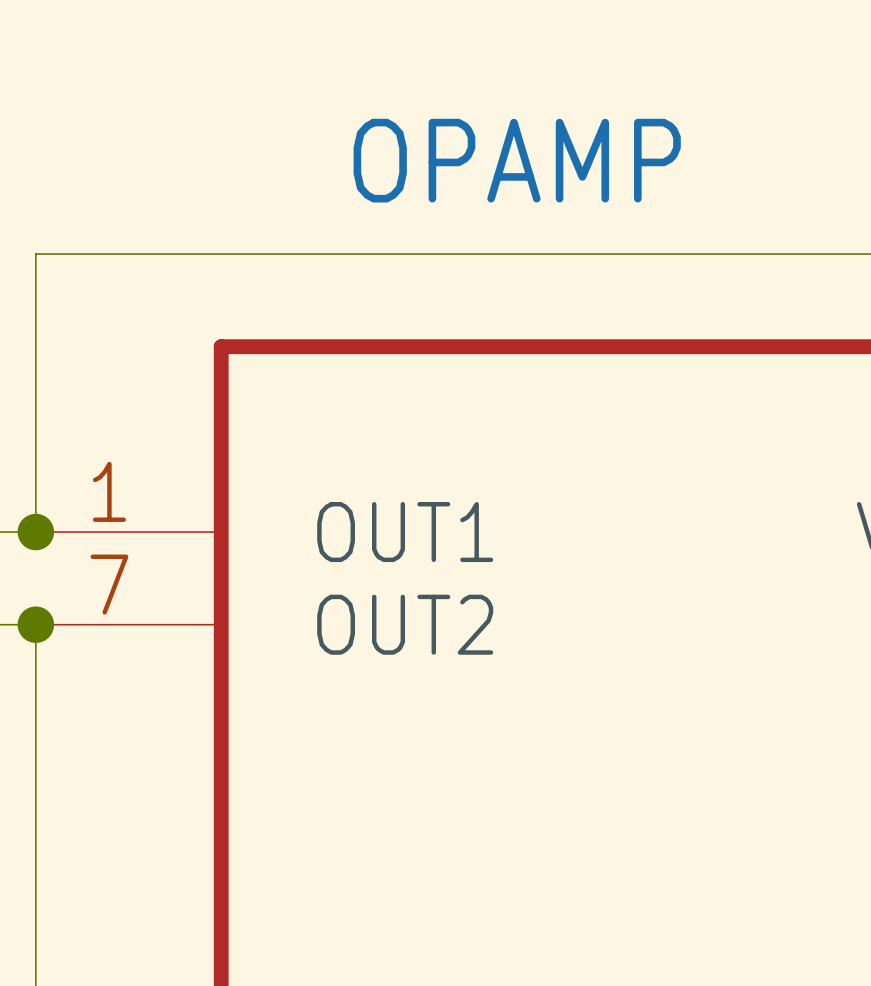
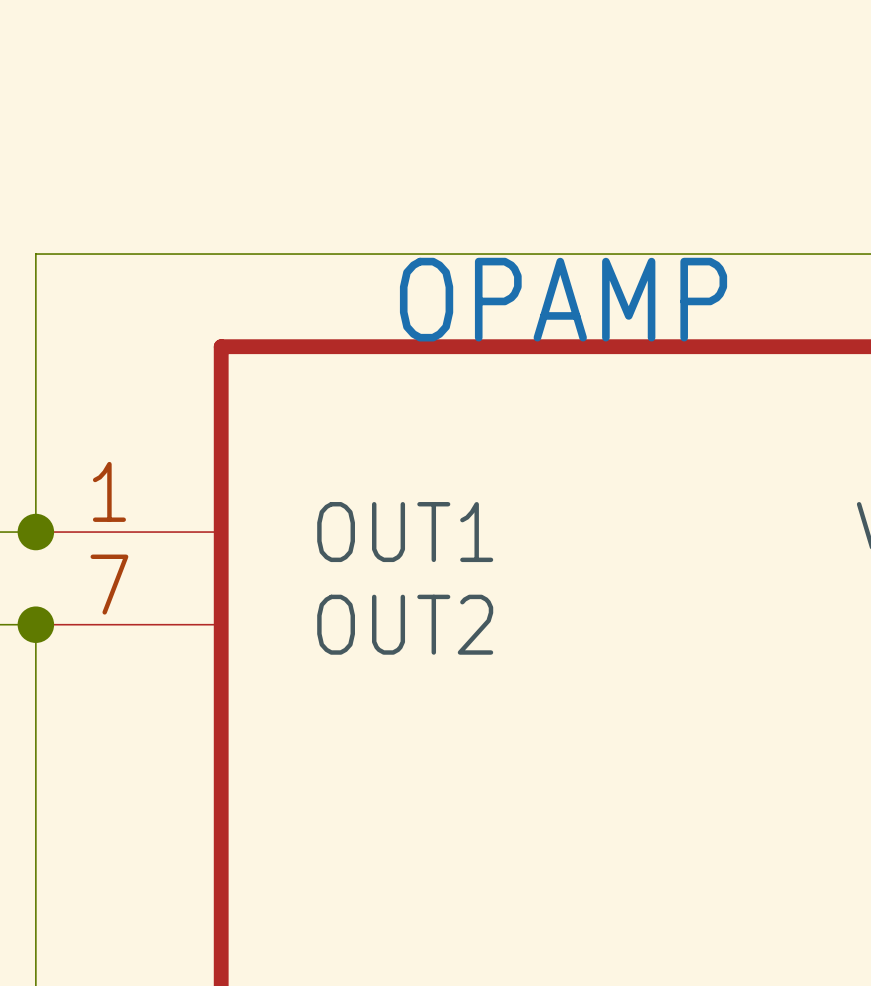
OPAMP name position: OPAMP (517, 160) -> OPAMP (563, 299)

